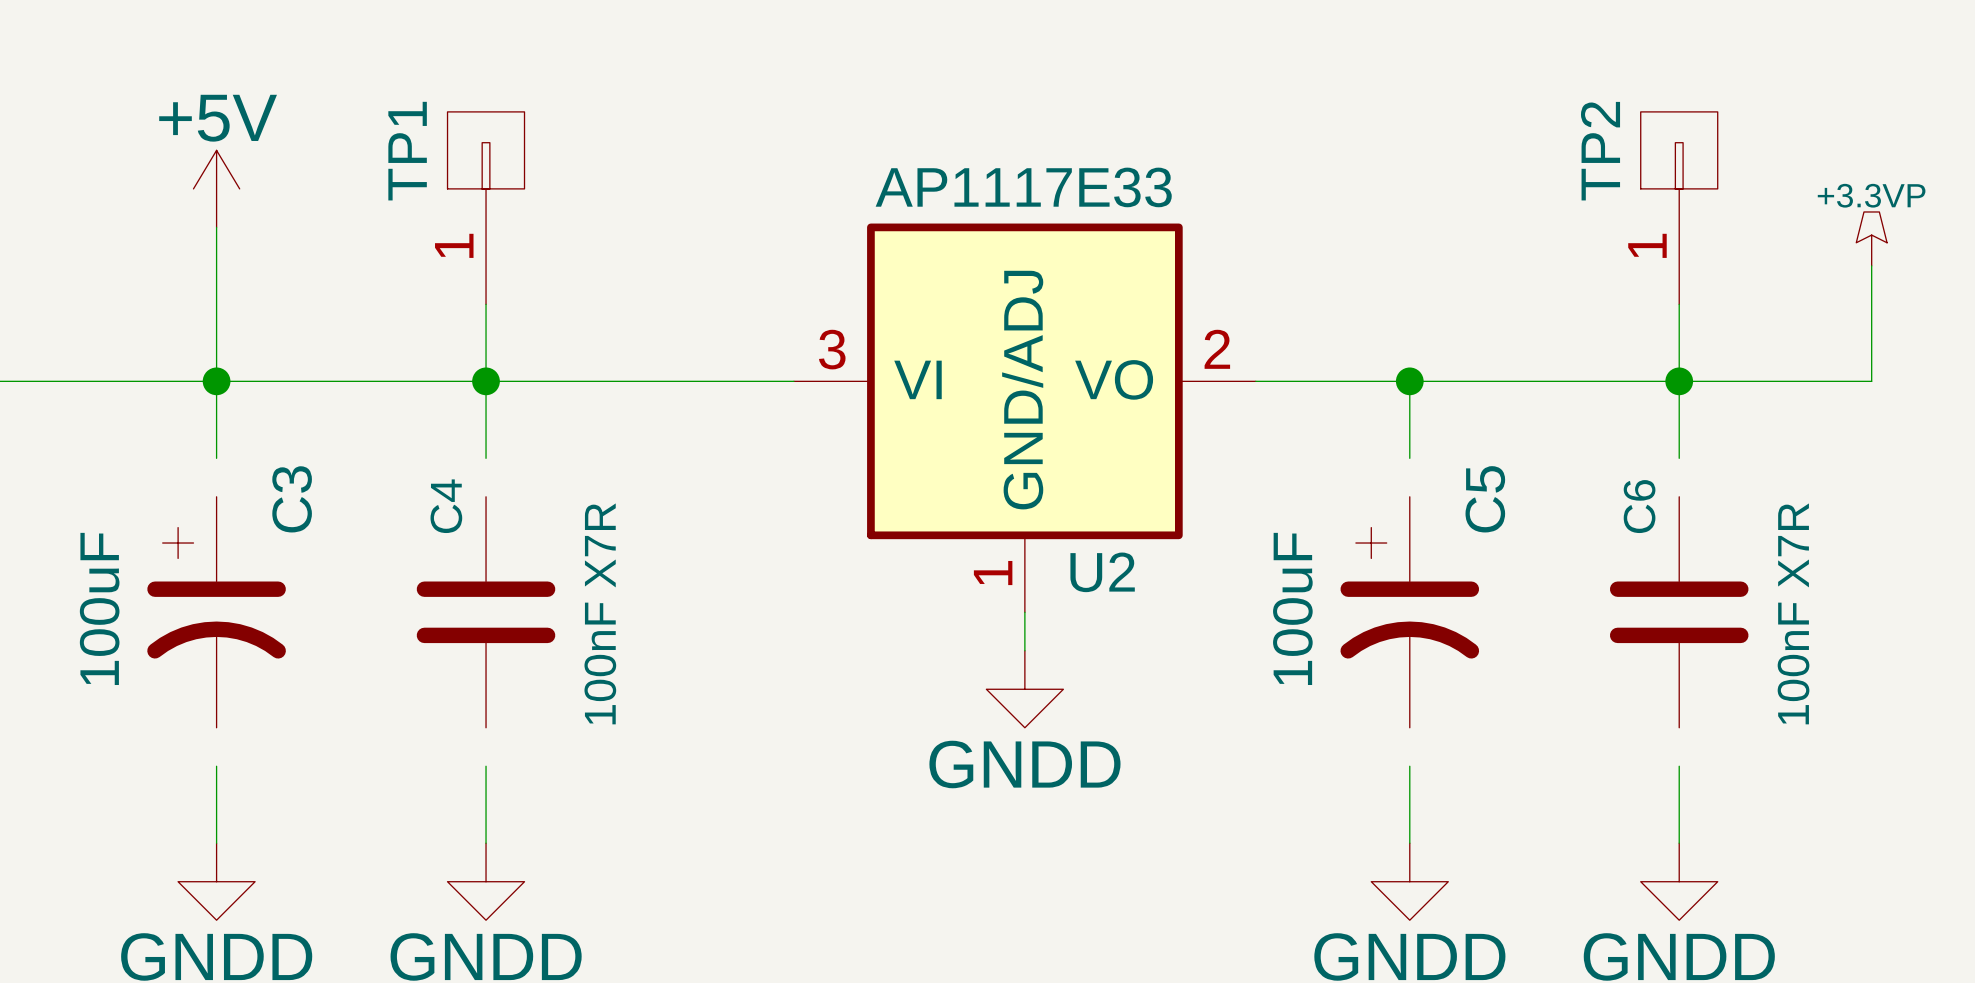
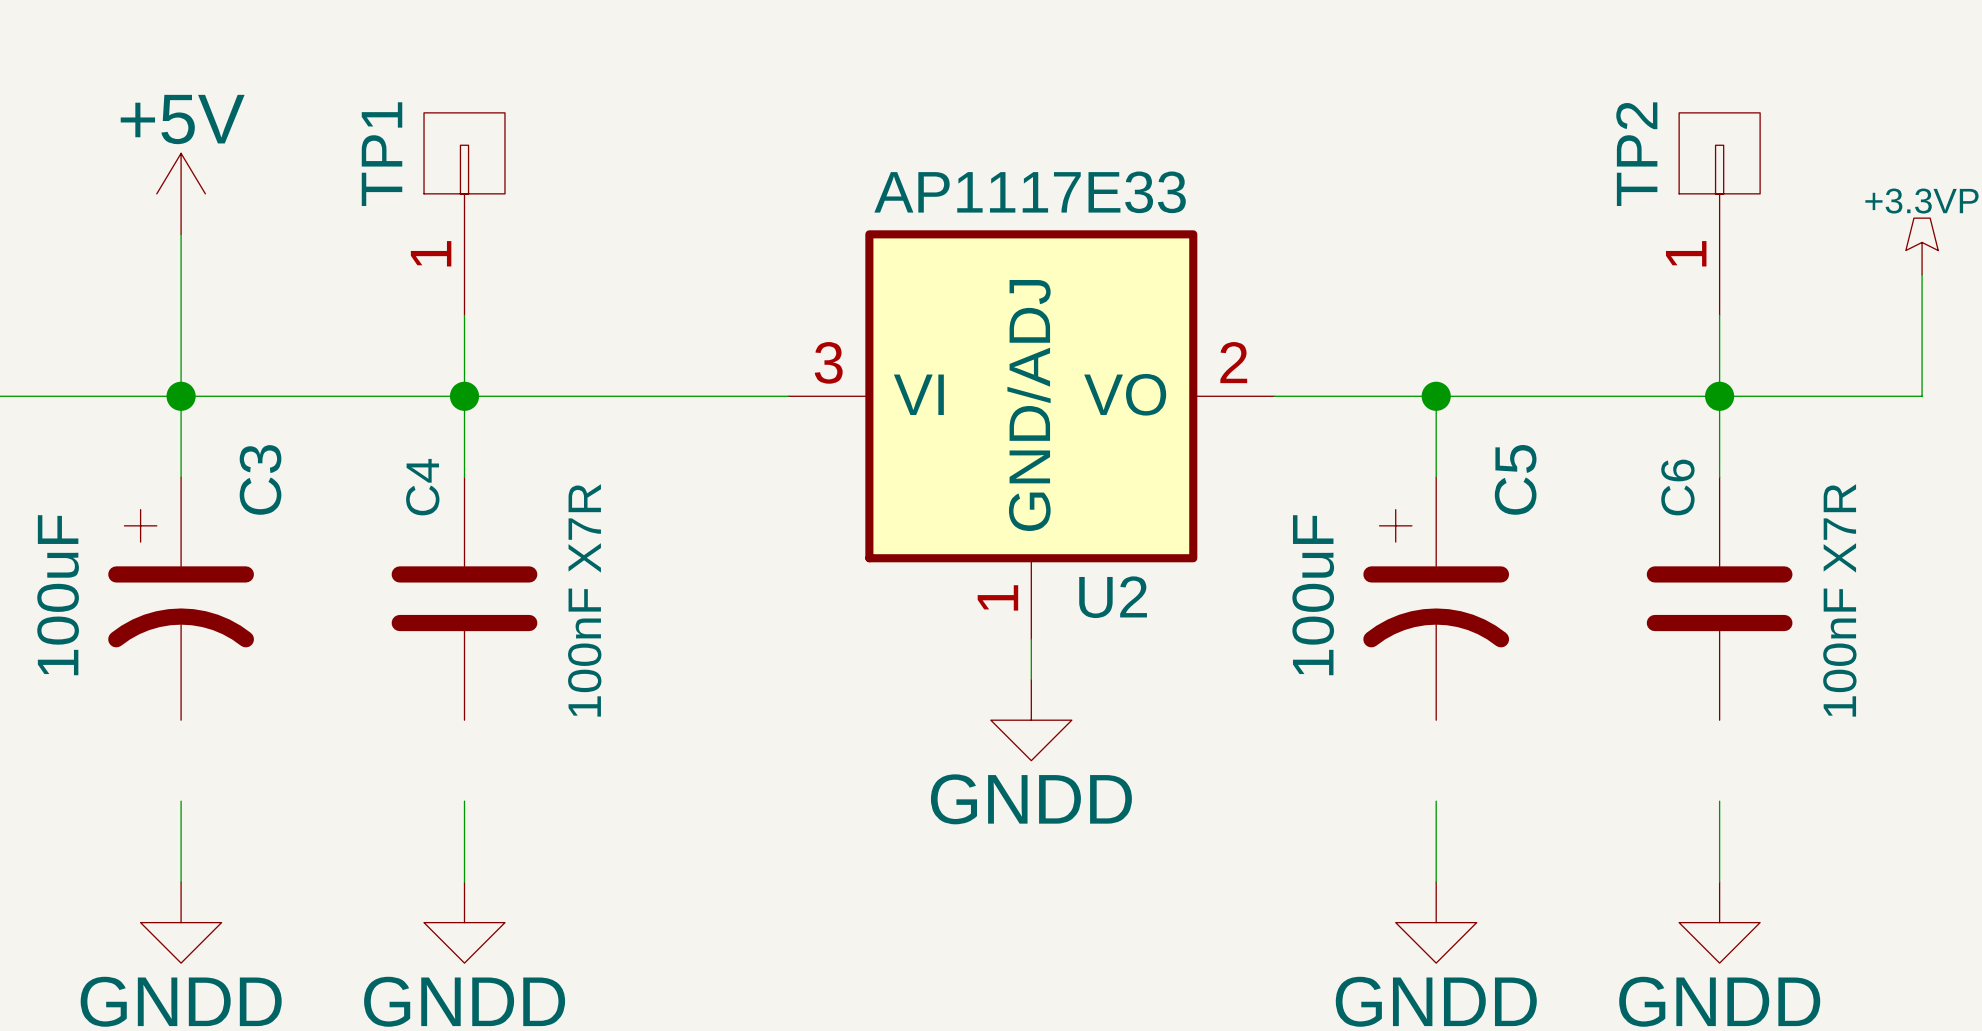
C3 position: (216, 612) -> (181, 598)
C4 position: (486, 612) -> (464, 598)
C5 position: (1409, 612) -> (1436, 598)
C6 position: (1679, 612) -> (1719, 598)

